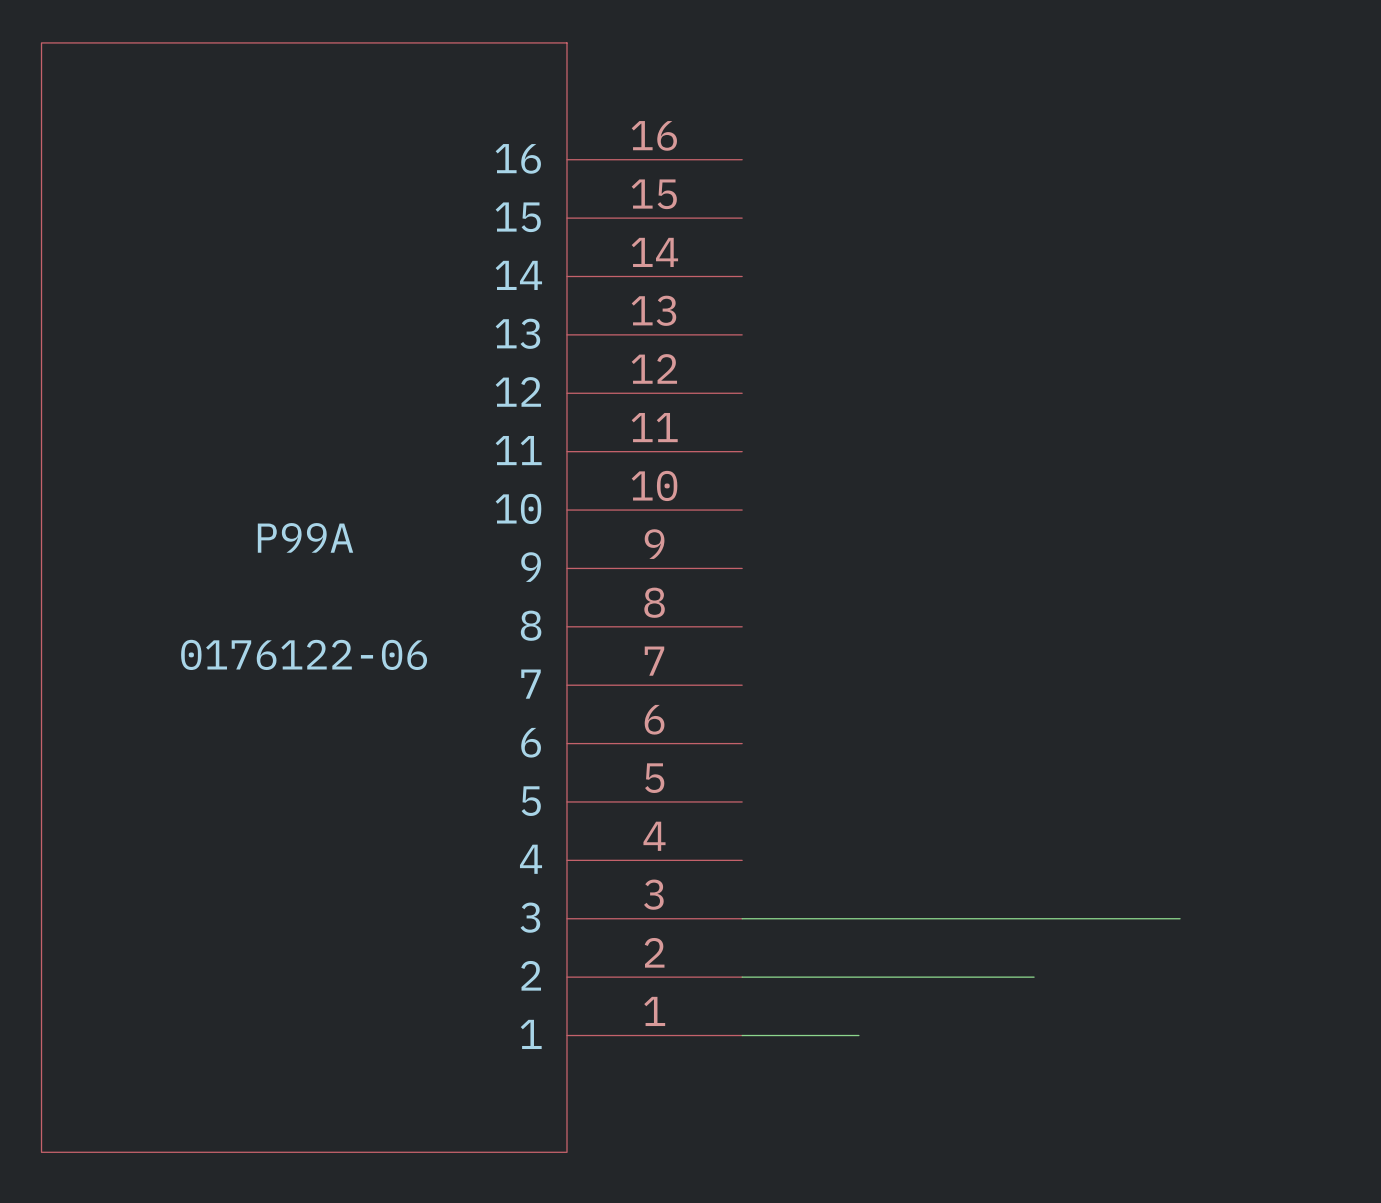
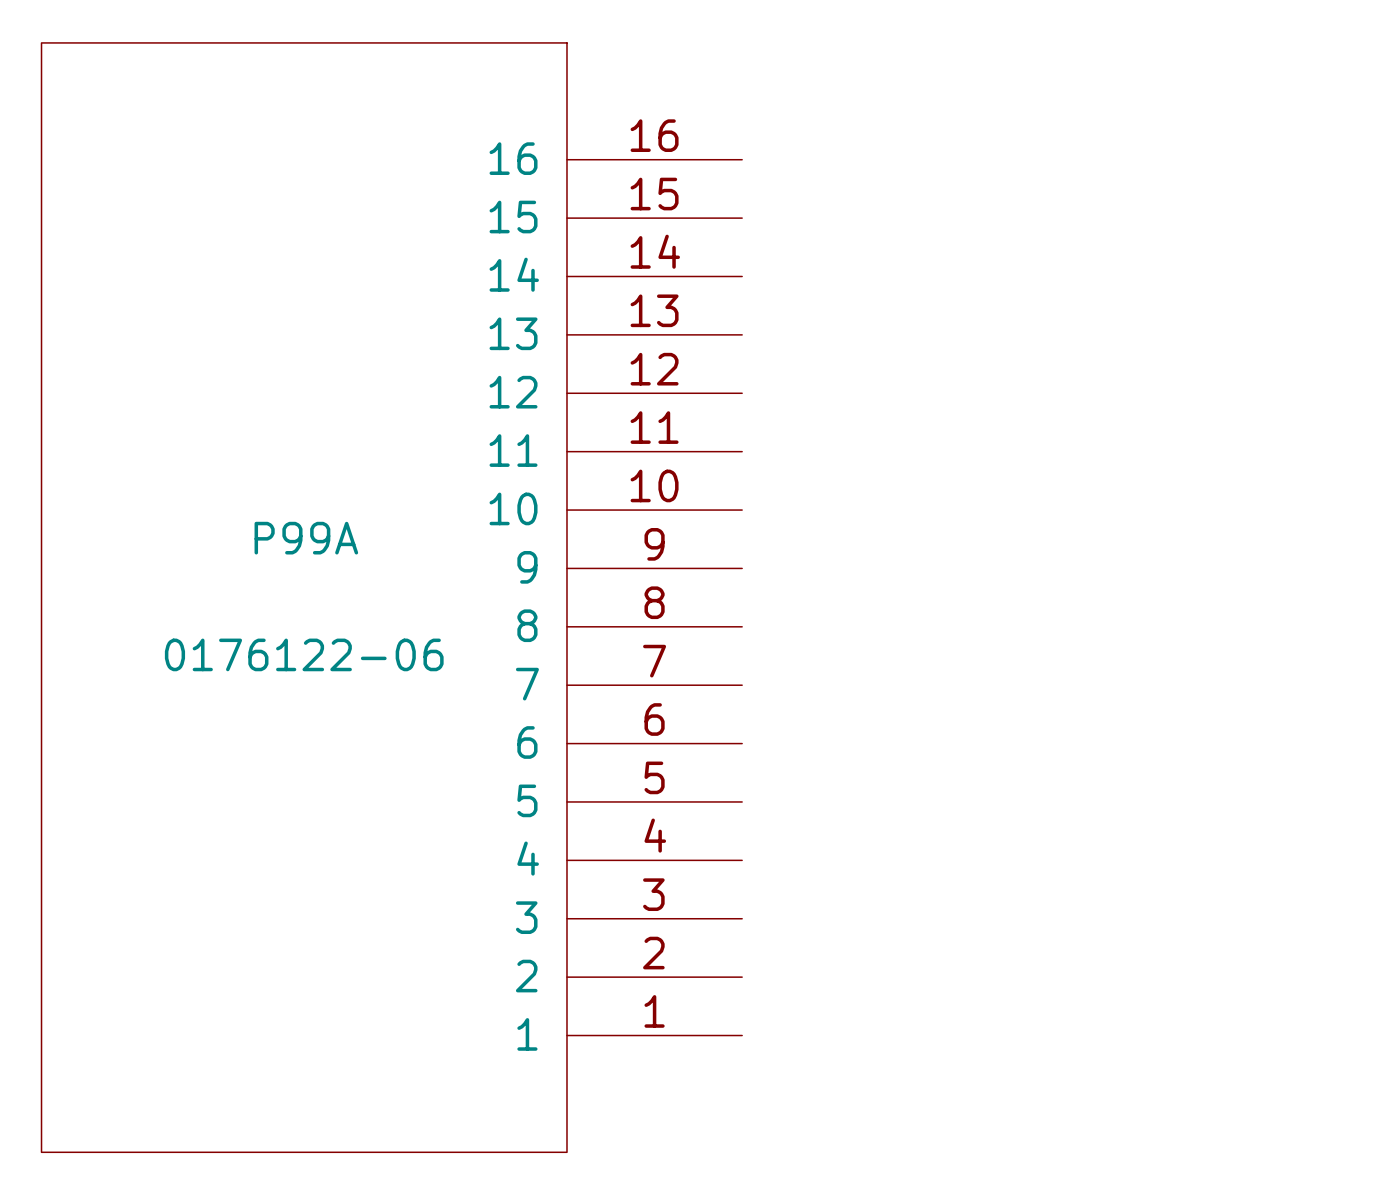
wire: (742, 918) (1180, 918) -> none
wire: (742, 977) (1034, 977) -> none
wire: (742, 1035) (858, 1035) -> none

